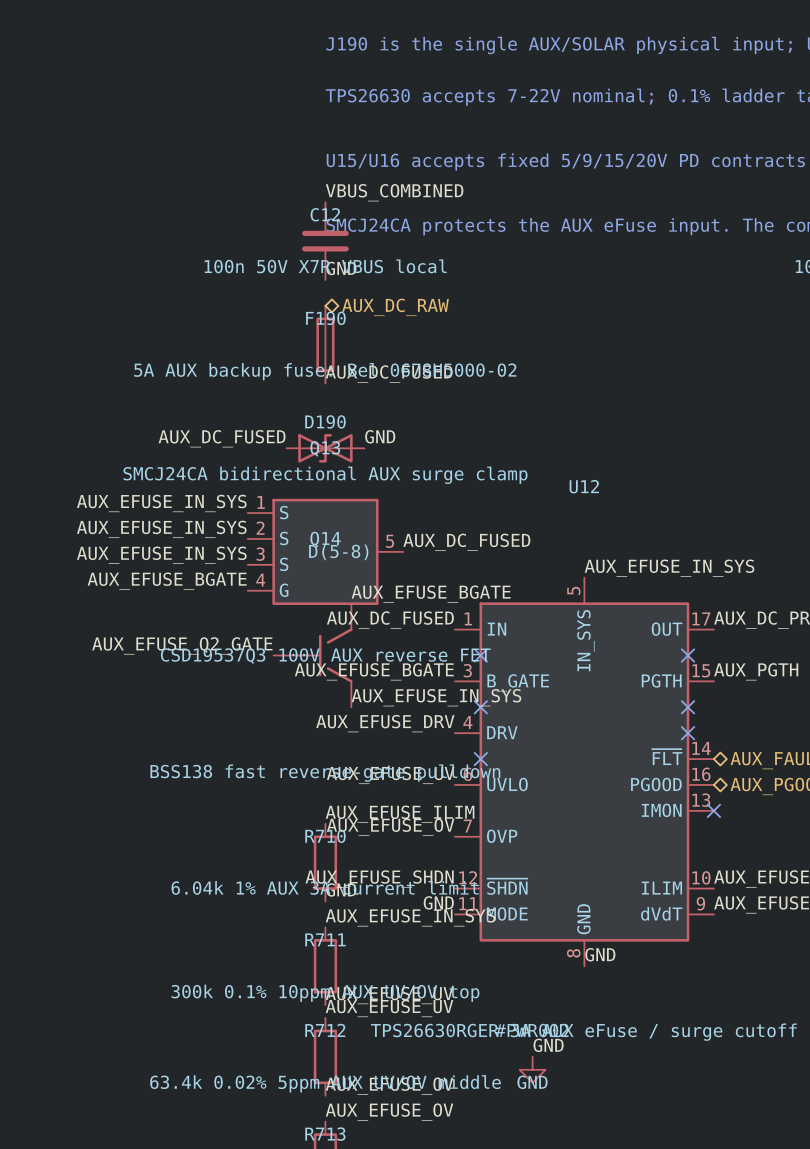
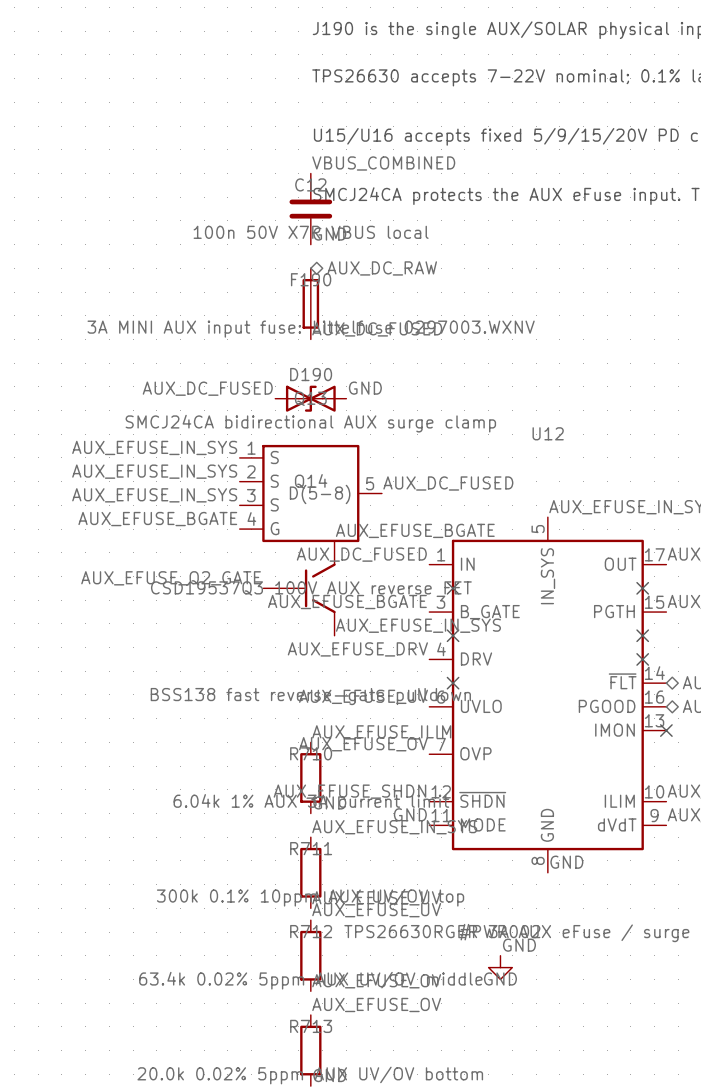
F190 value: 5A AUX backup fuse: Bel 0678H5000-02 (325, 371) -> 3A MINI AUX input fuse: Littelfuse 0297003.WXNV (311, 329)

